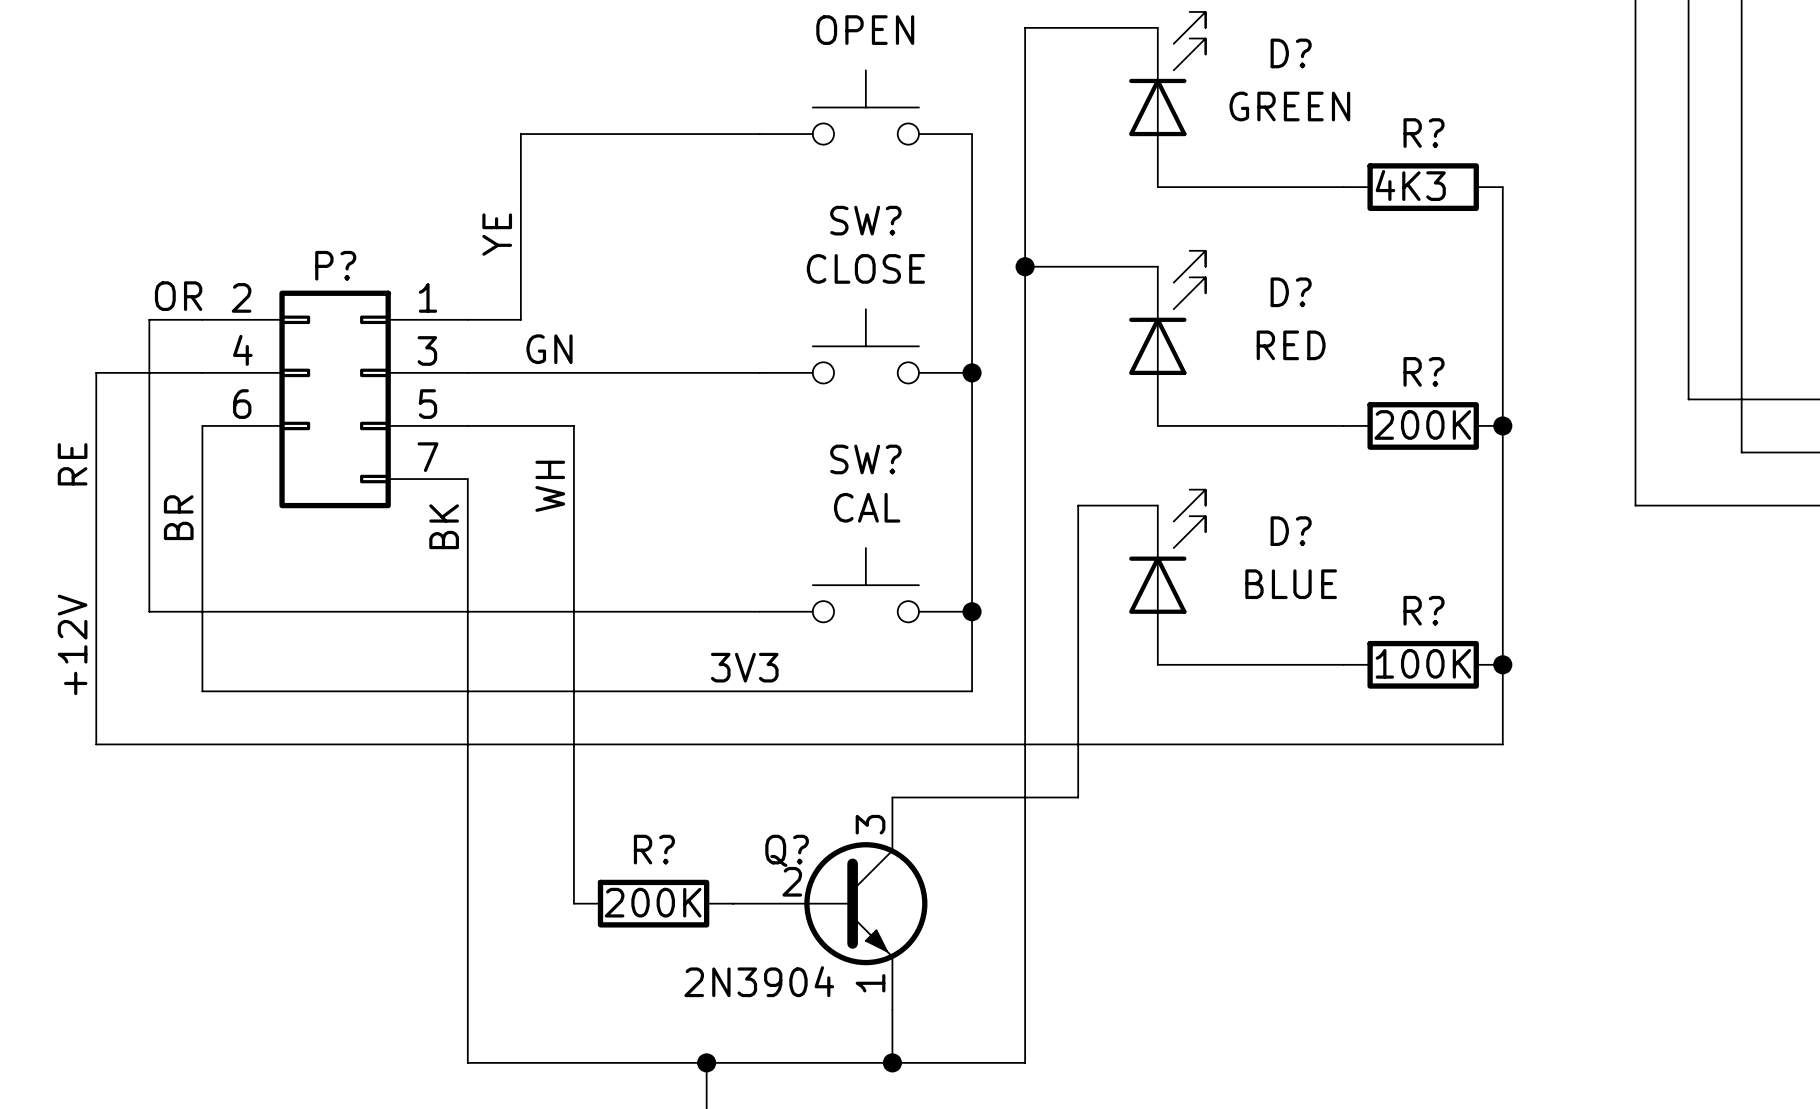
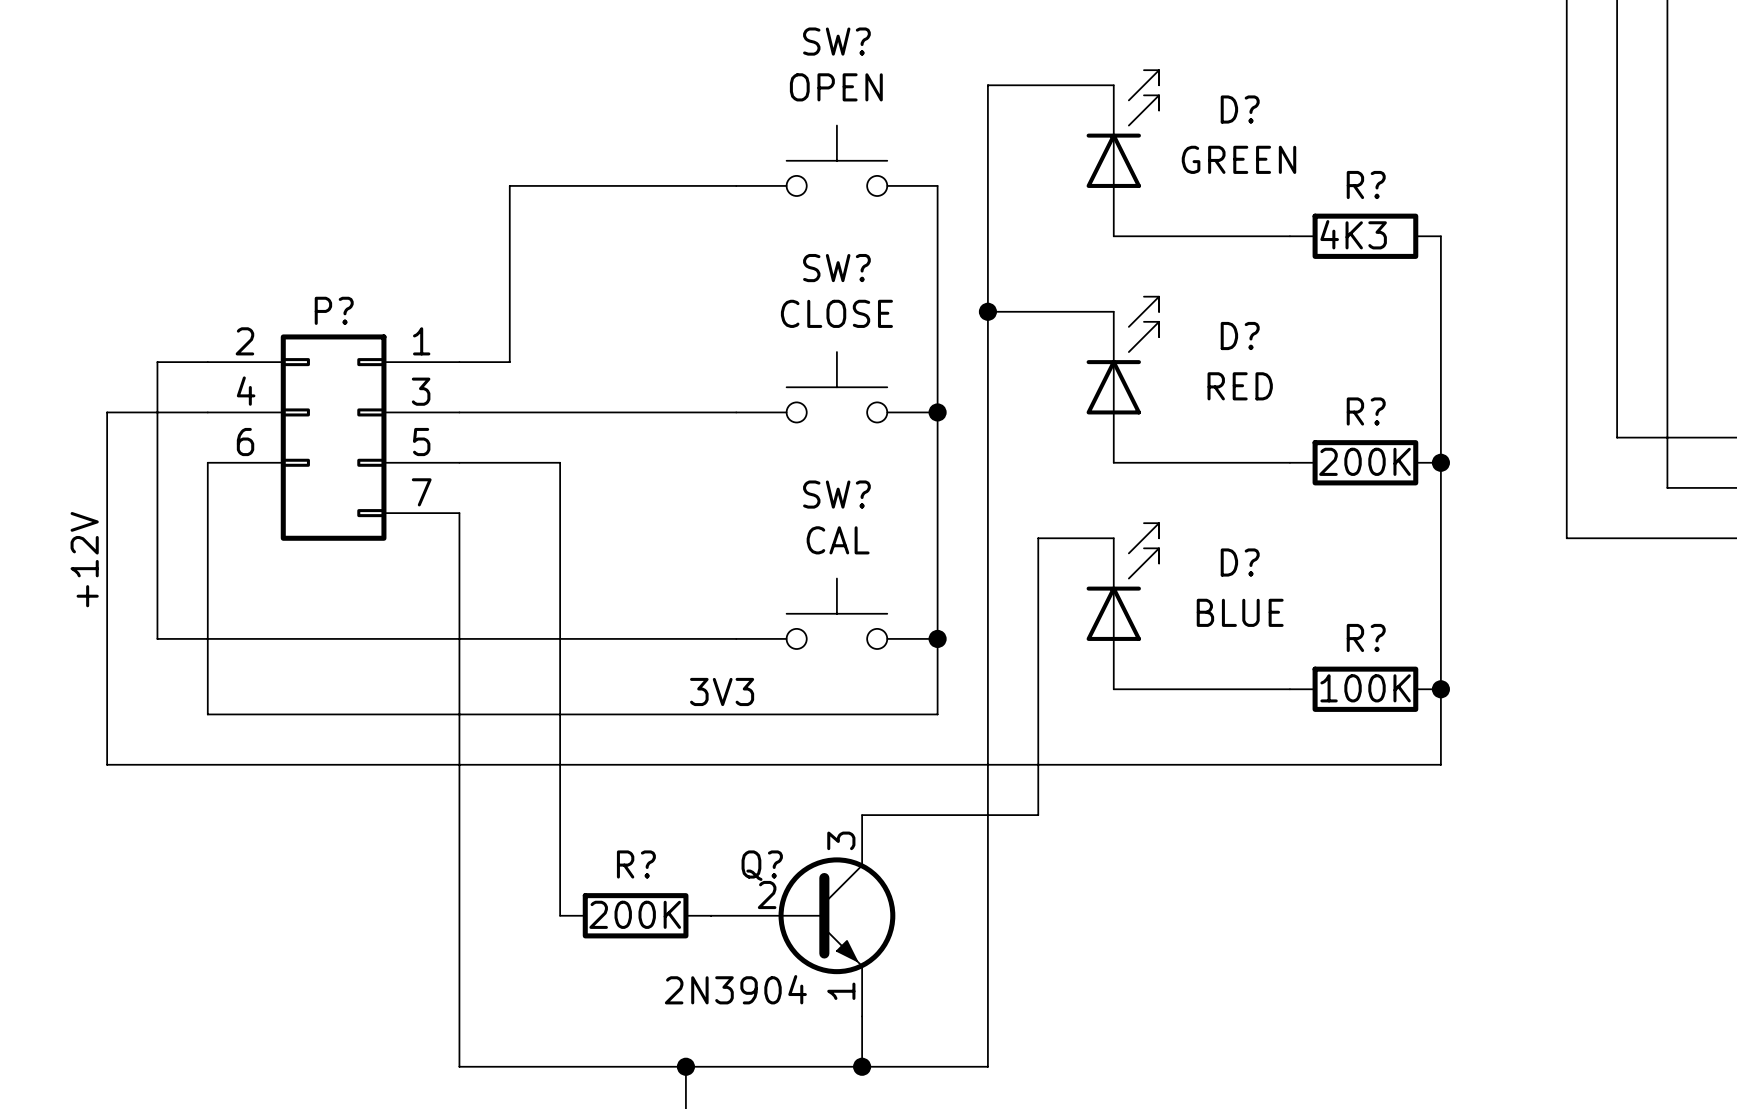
label: YE (497, 234) -> none
label: OR (178, 296) -> none
label: GN (549, 349) -> none
label: RE (72, 464) -> none
label: WH (550, 486) -> none
label: BR (178, 517) -> none
label: BK (444, 526) -> none
label position: +12V (72, 644) -> +12V (84, 559)

